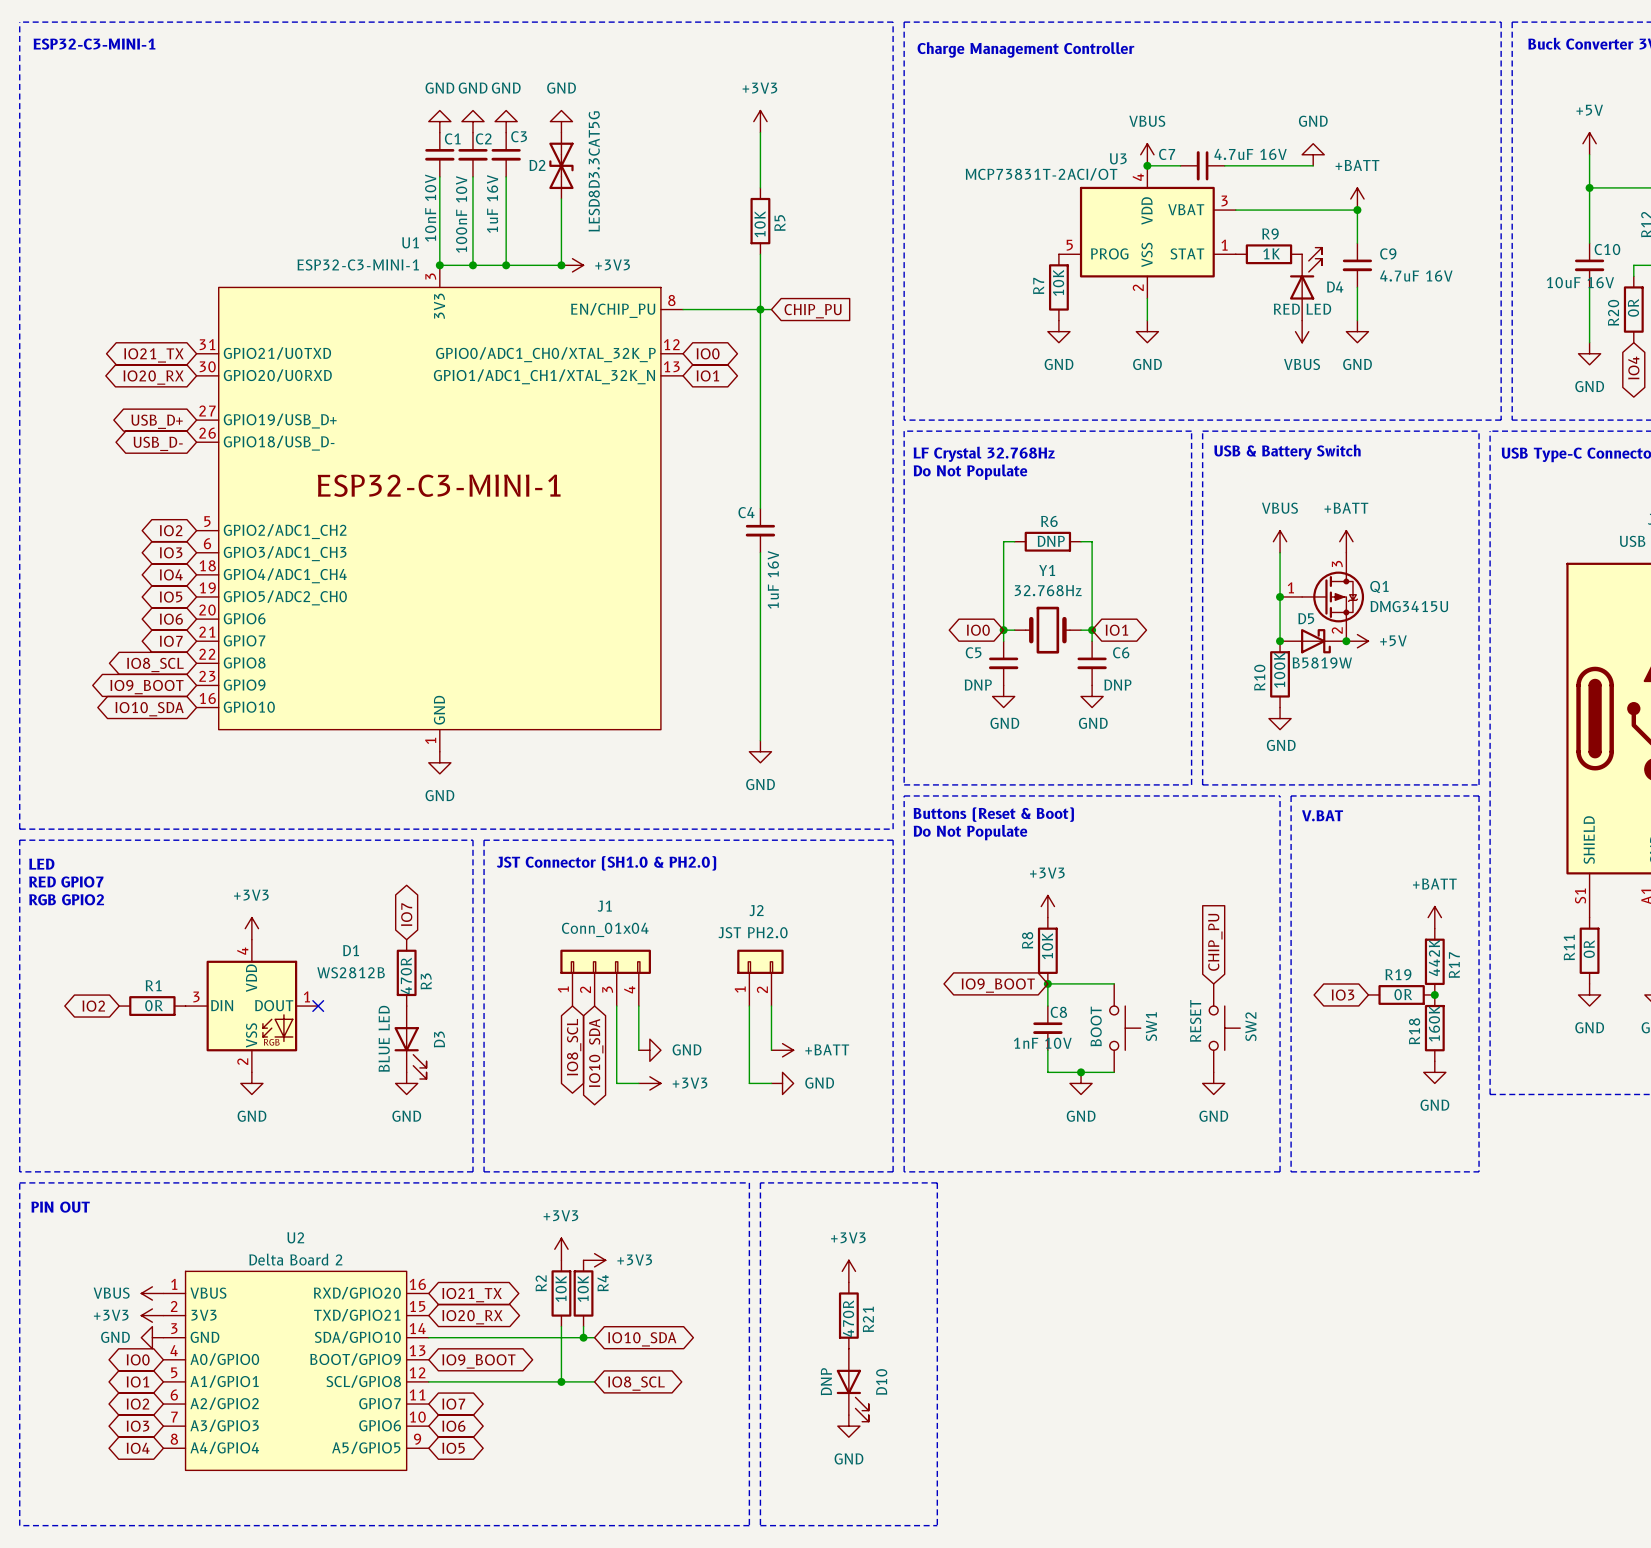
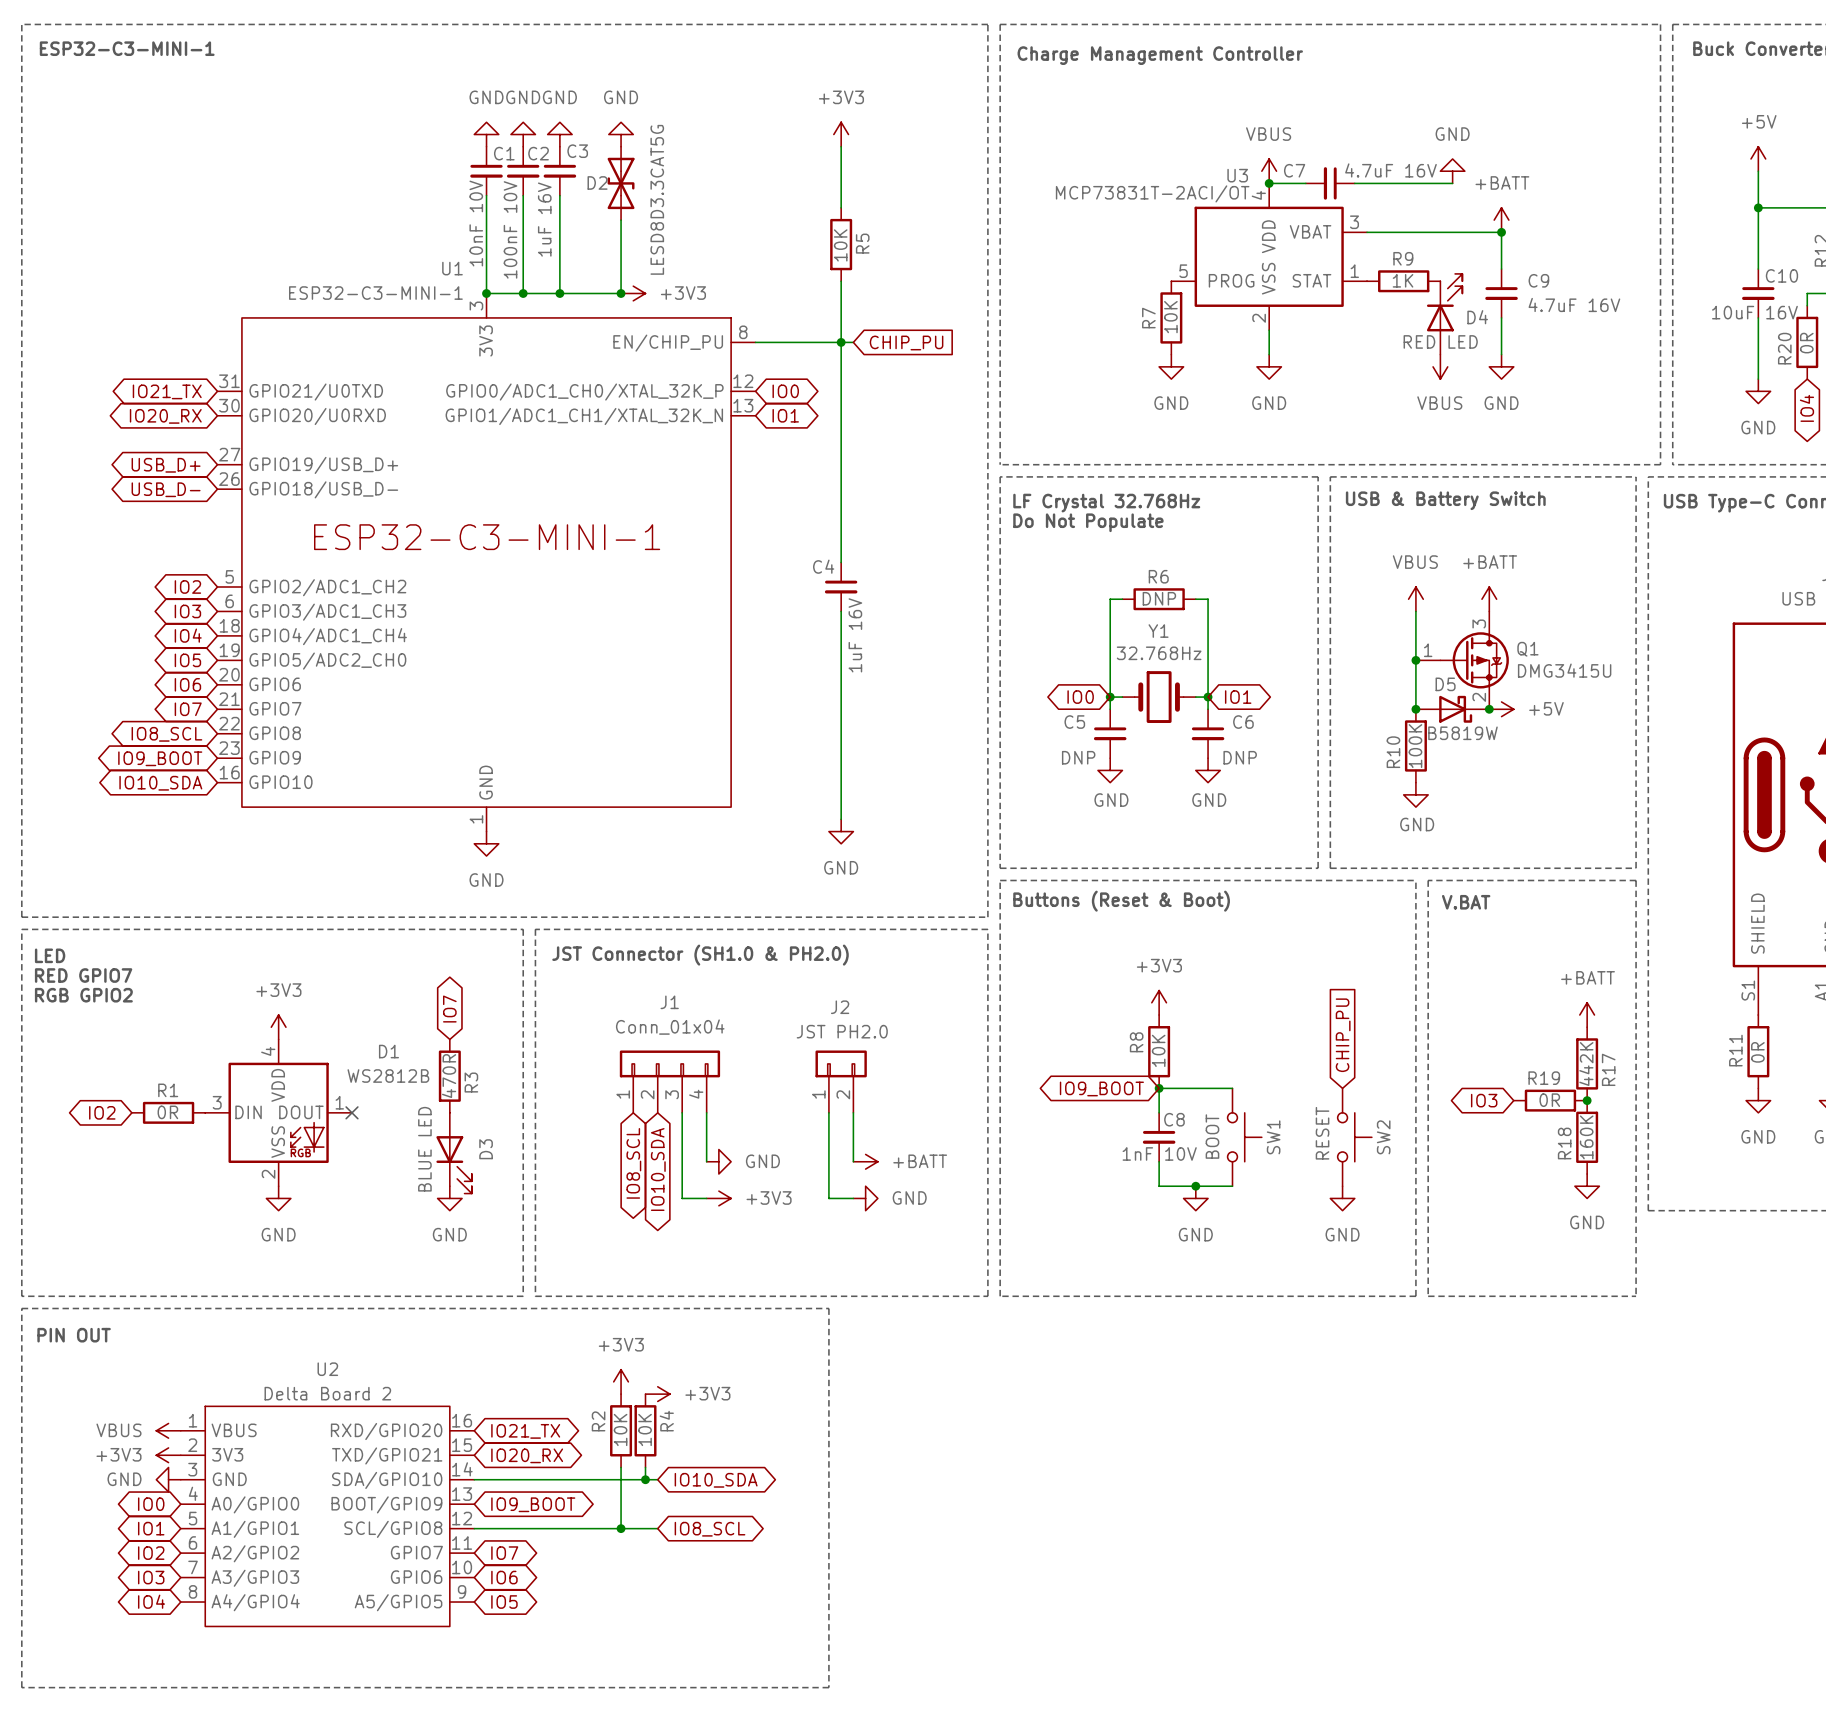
text: Do Not Populate (970, 832) -> none
line: (760, 1182) (760, 1525) (937, 1525) (937, 1182) (760, 1182) -> none
power symbol: +3V3 (848, 1271) -> none
R21: 470R (848, 1315) -> none
D10: DNP (852, 1385) -> none
power symbol: GND (848, 1426) -> none

